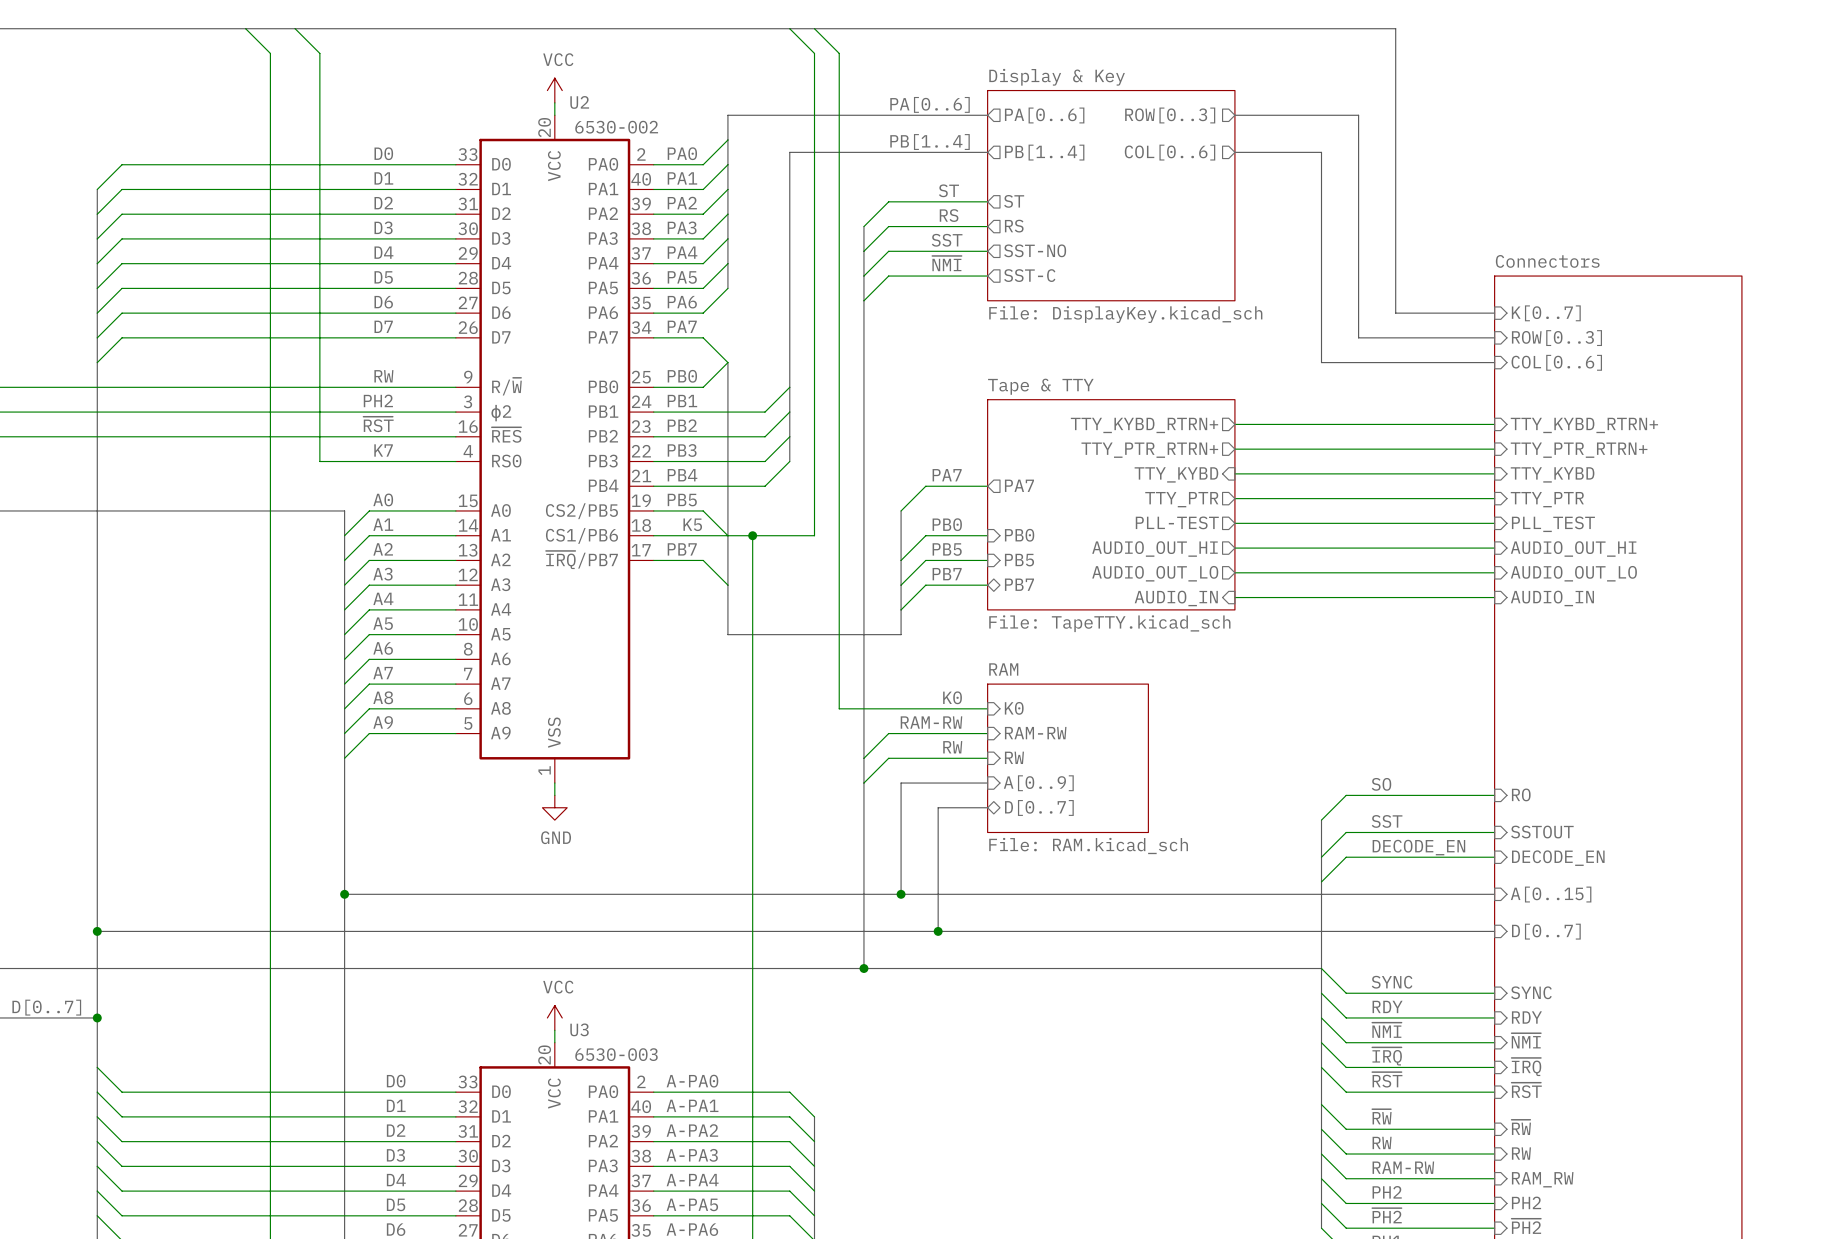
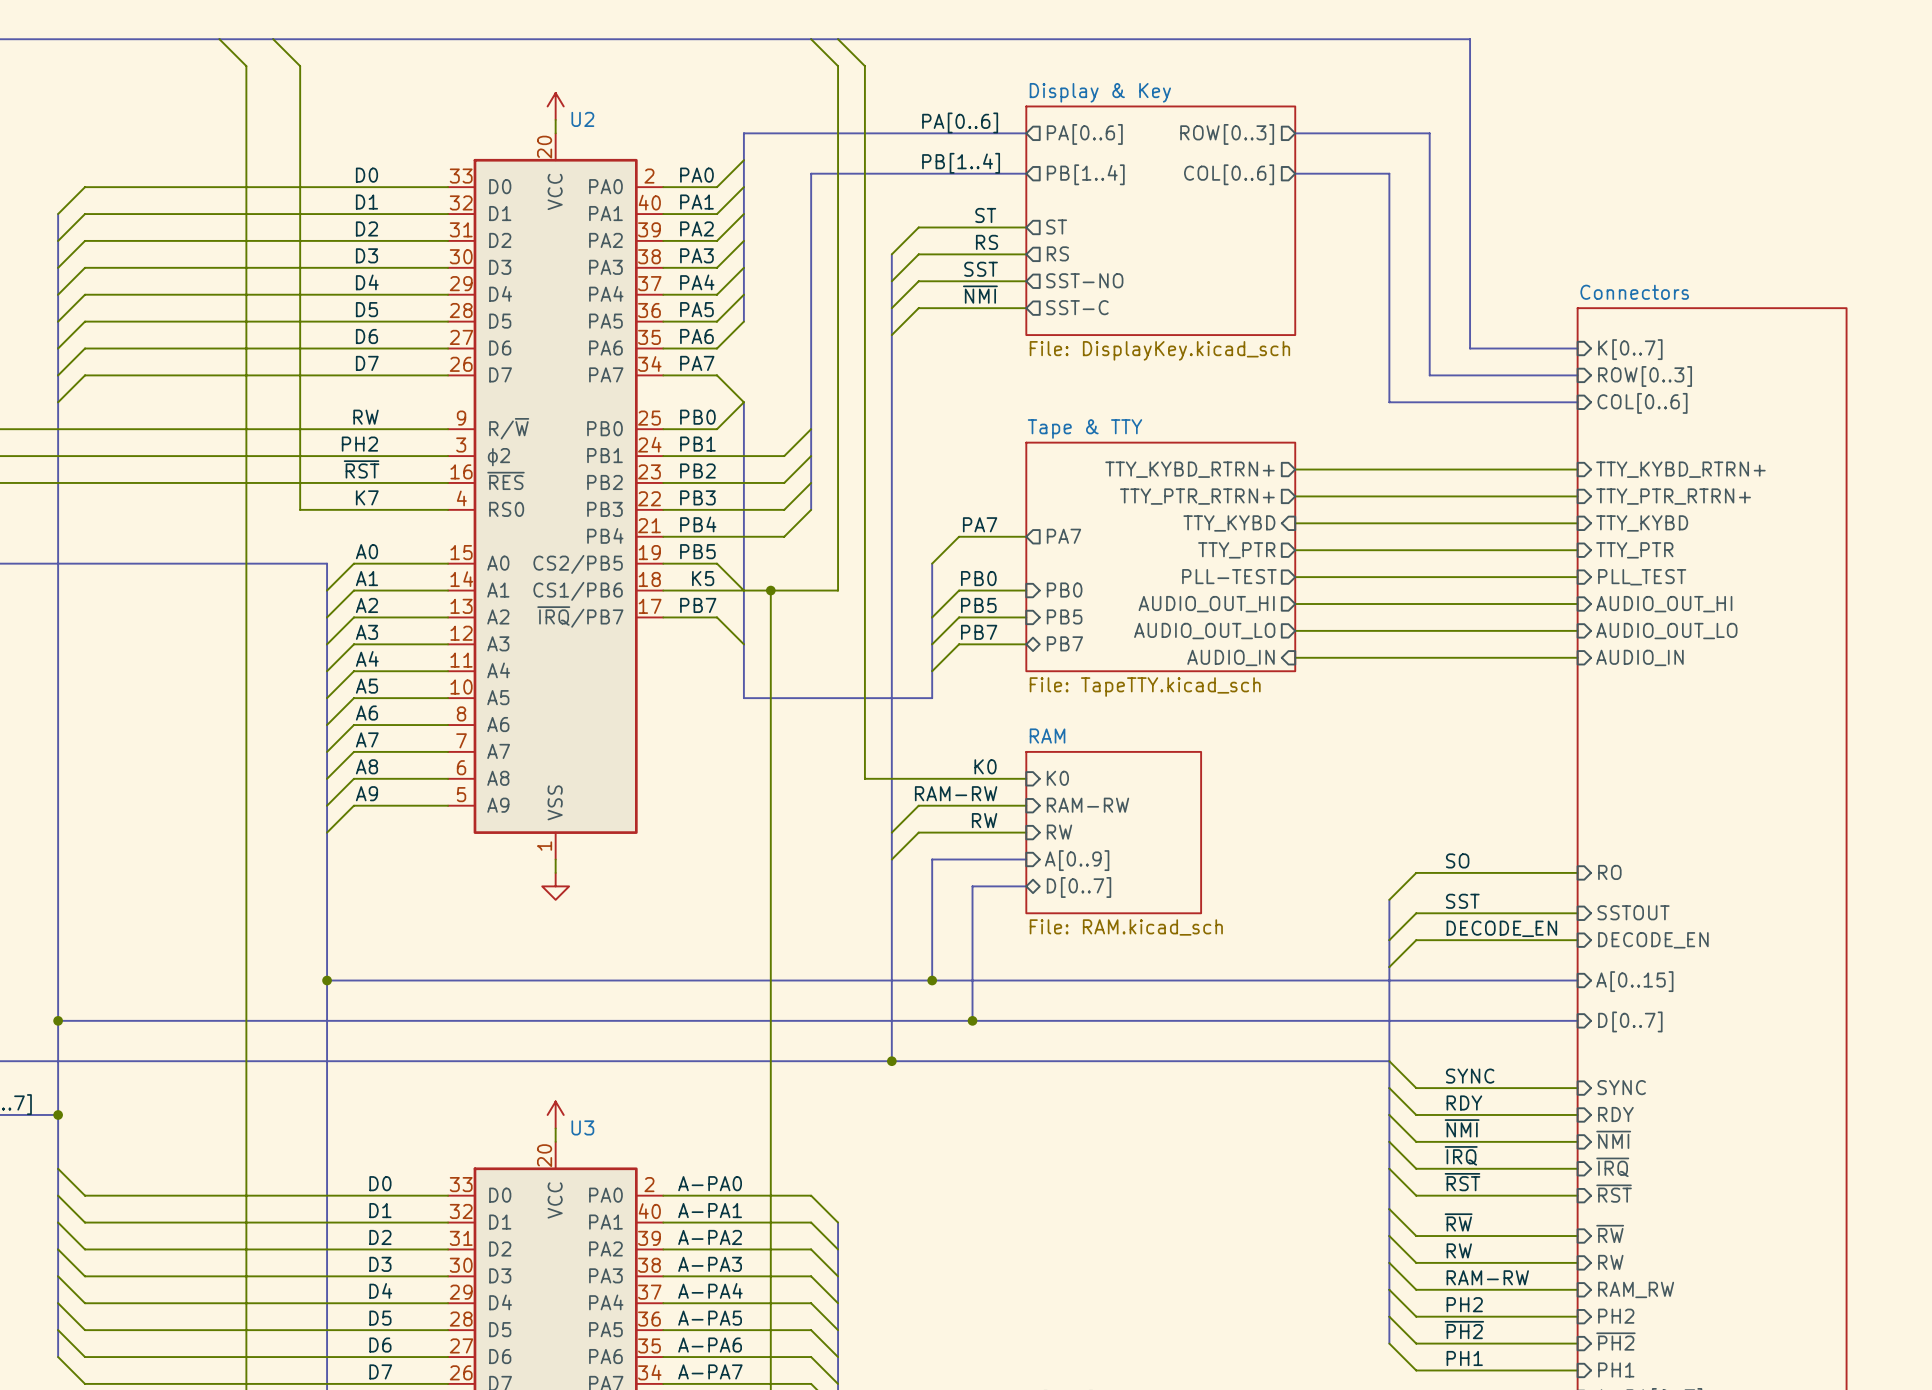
power symbol text: VCC (558, 59) -> none
U2 value: 6530-002 (616, 127) -> none
power symbol text: GND (556, 837) -> none
power symbol text: VCC (558, 987) -> none
U3 value: 6530-003 (616, 1054) -> none

